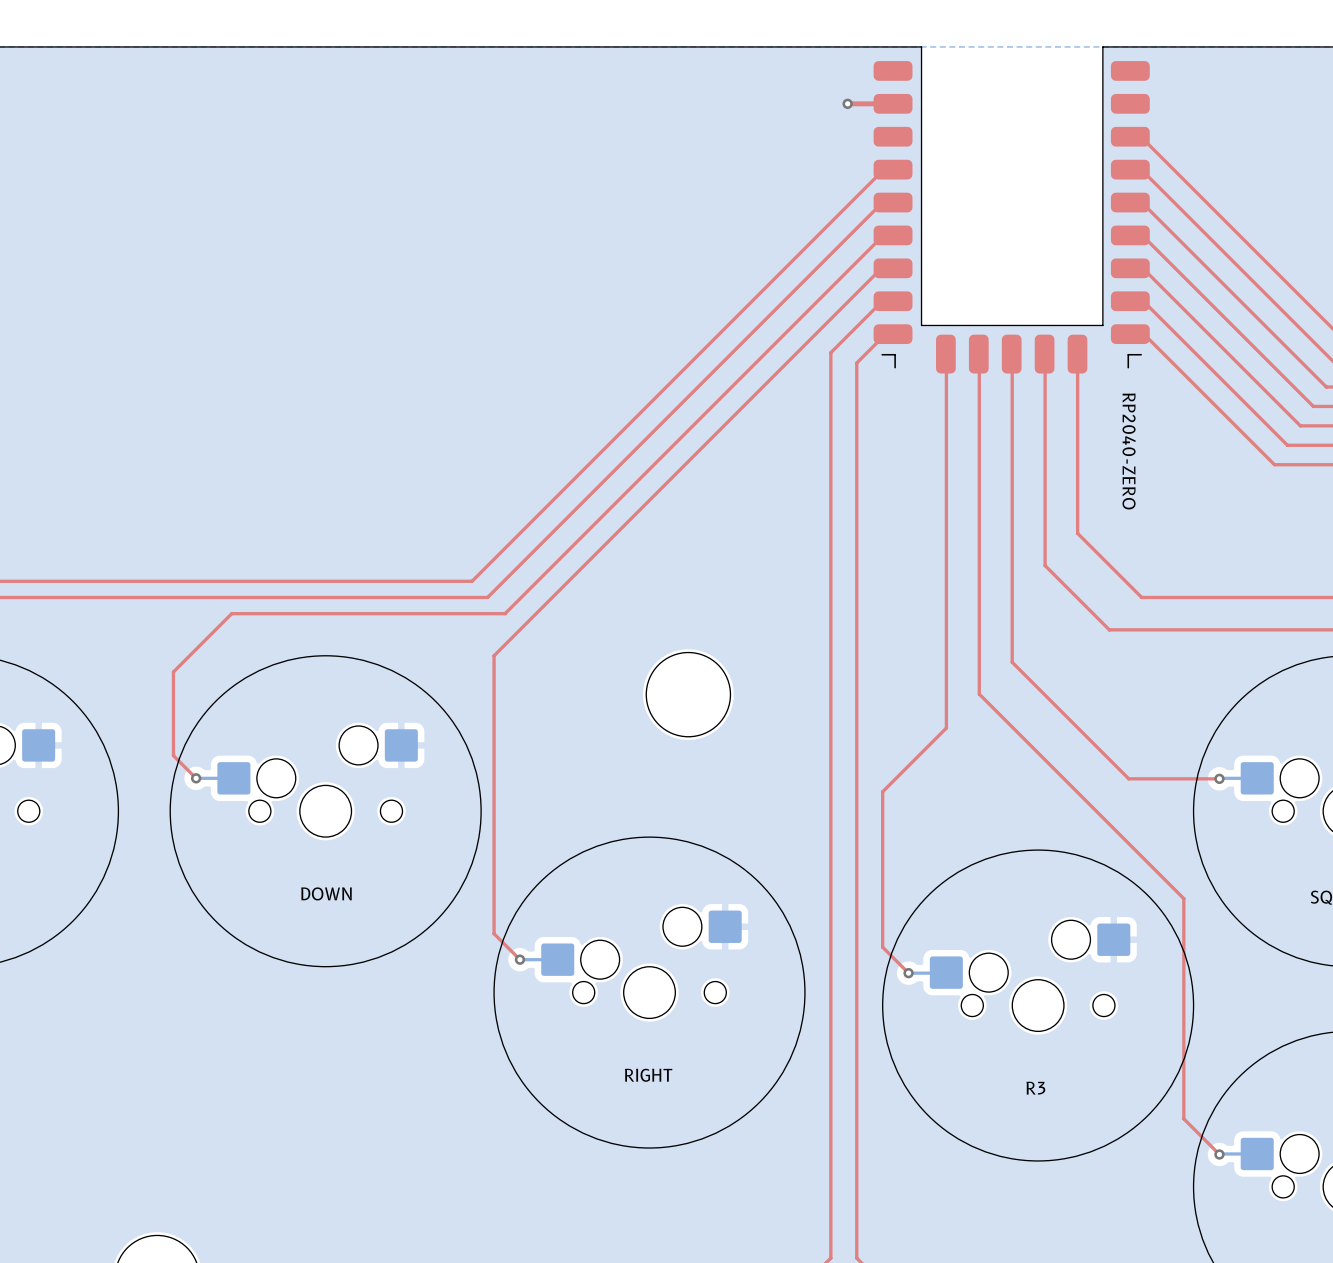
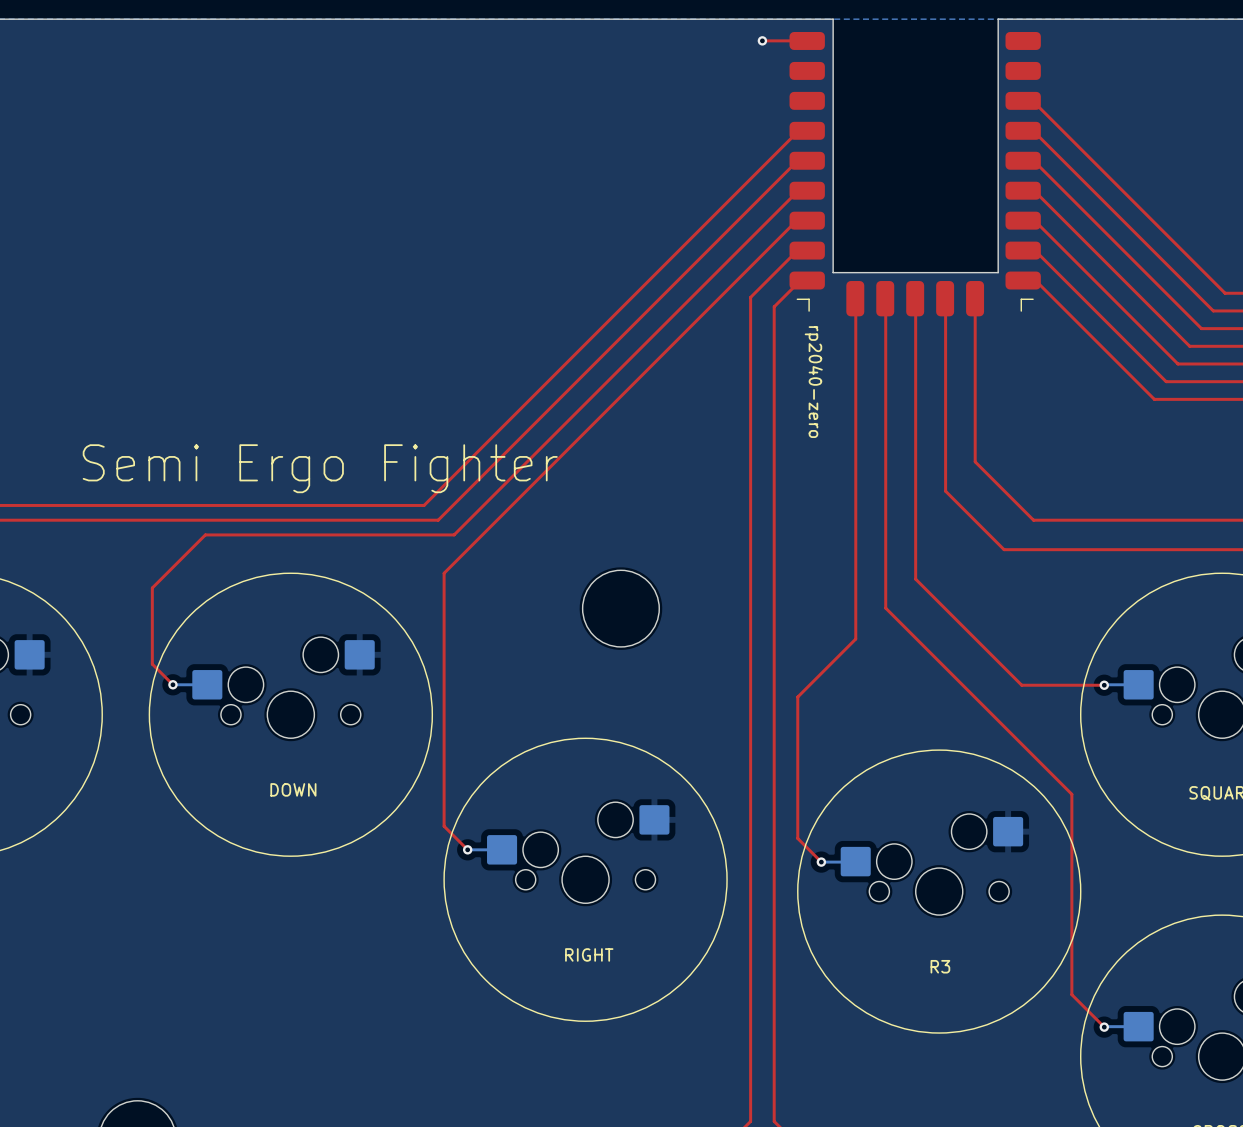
top track: none -> (762, 40) (807, 40)
top track: (847, 103) (893, 103) -> none
via position: (847, 103) -> (762, 40)
part value: RP2040-ZERO (1129, 451) -> rp2040-zero (813, 382)
text: none -> Semi Ergo Fighter (320, 468)

